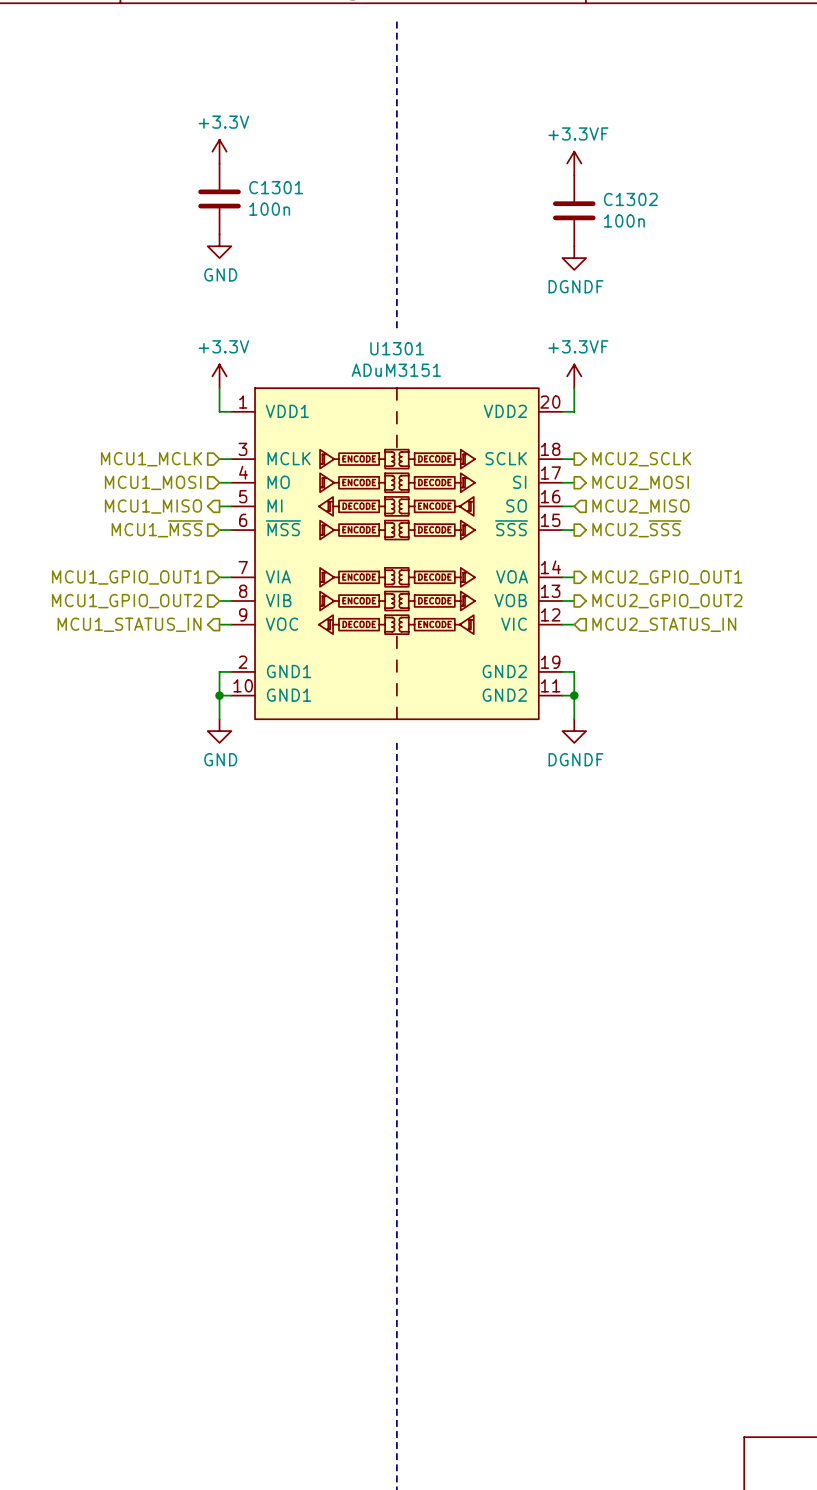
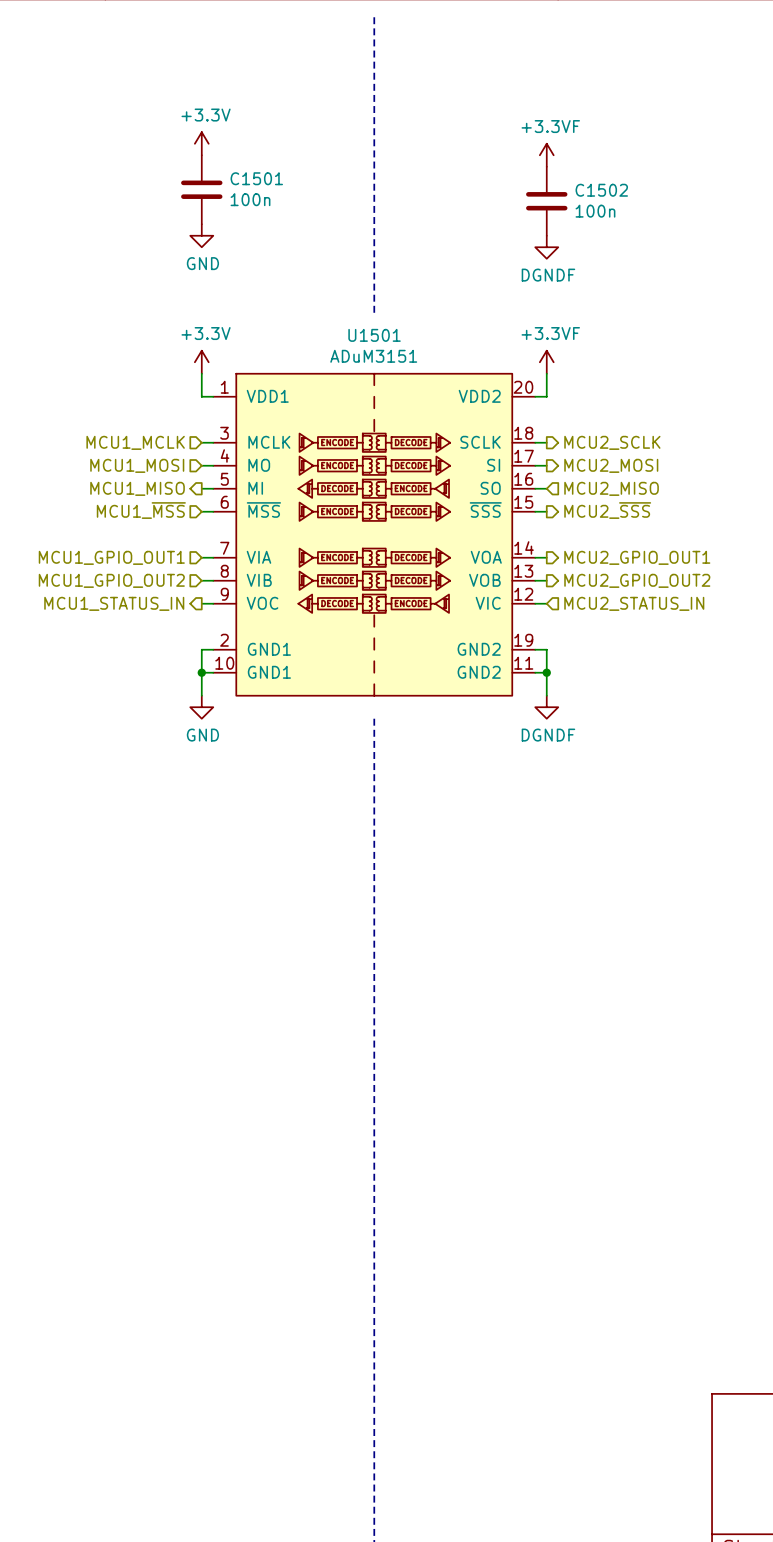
C1301 name: C1301 (276, 187) -> C1501 (256, 178)
C1302 name: C1302 (630, 199) -> C1502 (601, 190)
U1301 name: U1301 (397, 348) -> U1501 (374, 335)

